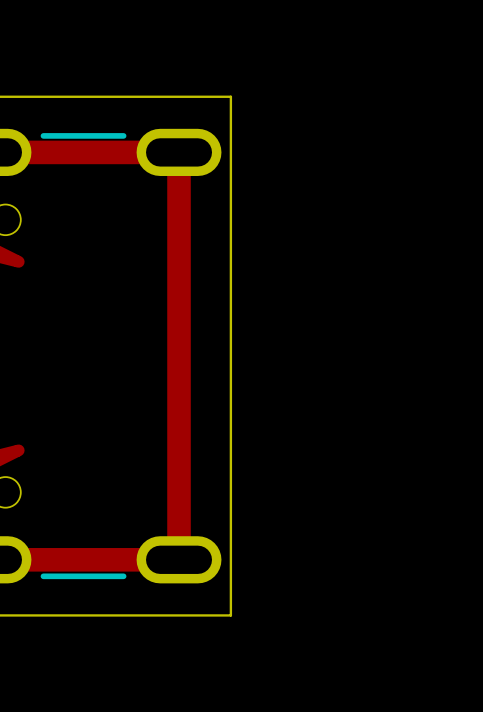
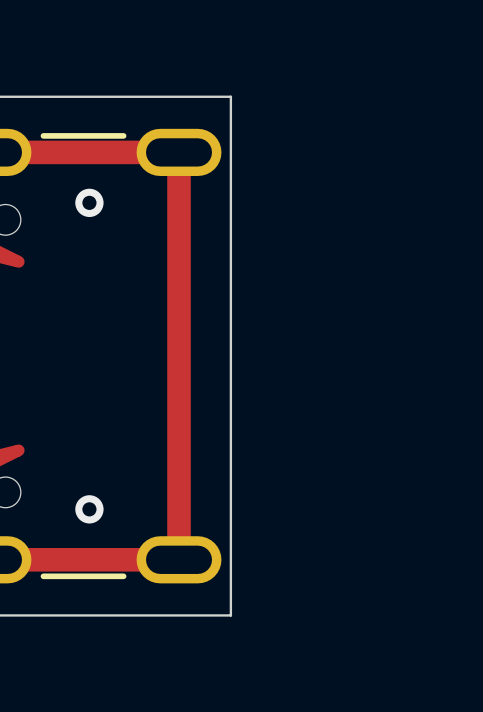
via: none -> (89, 202)
via: none -> (89, 509)

